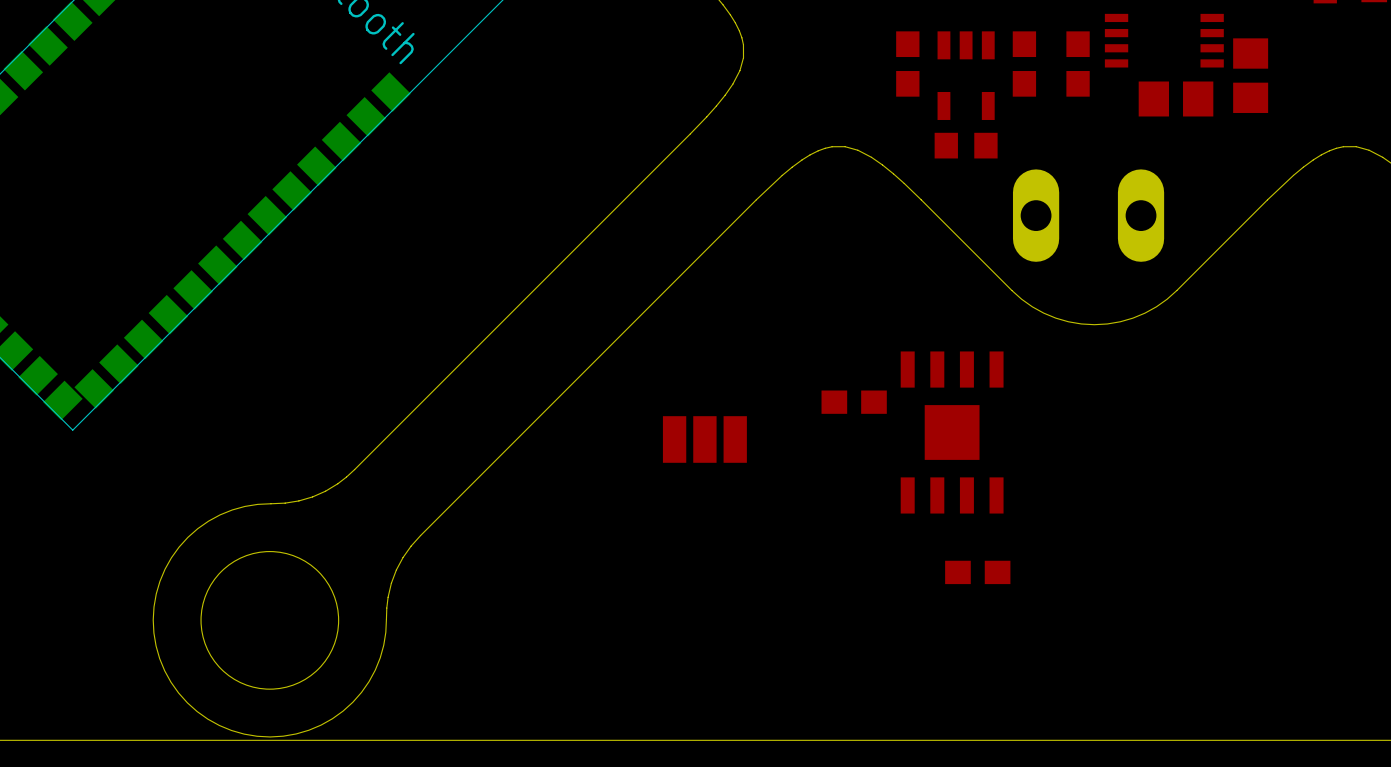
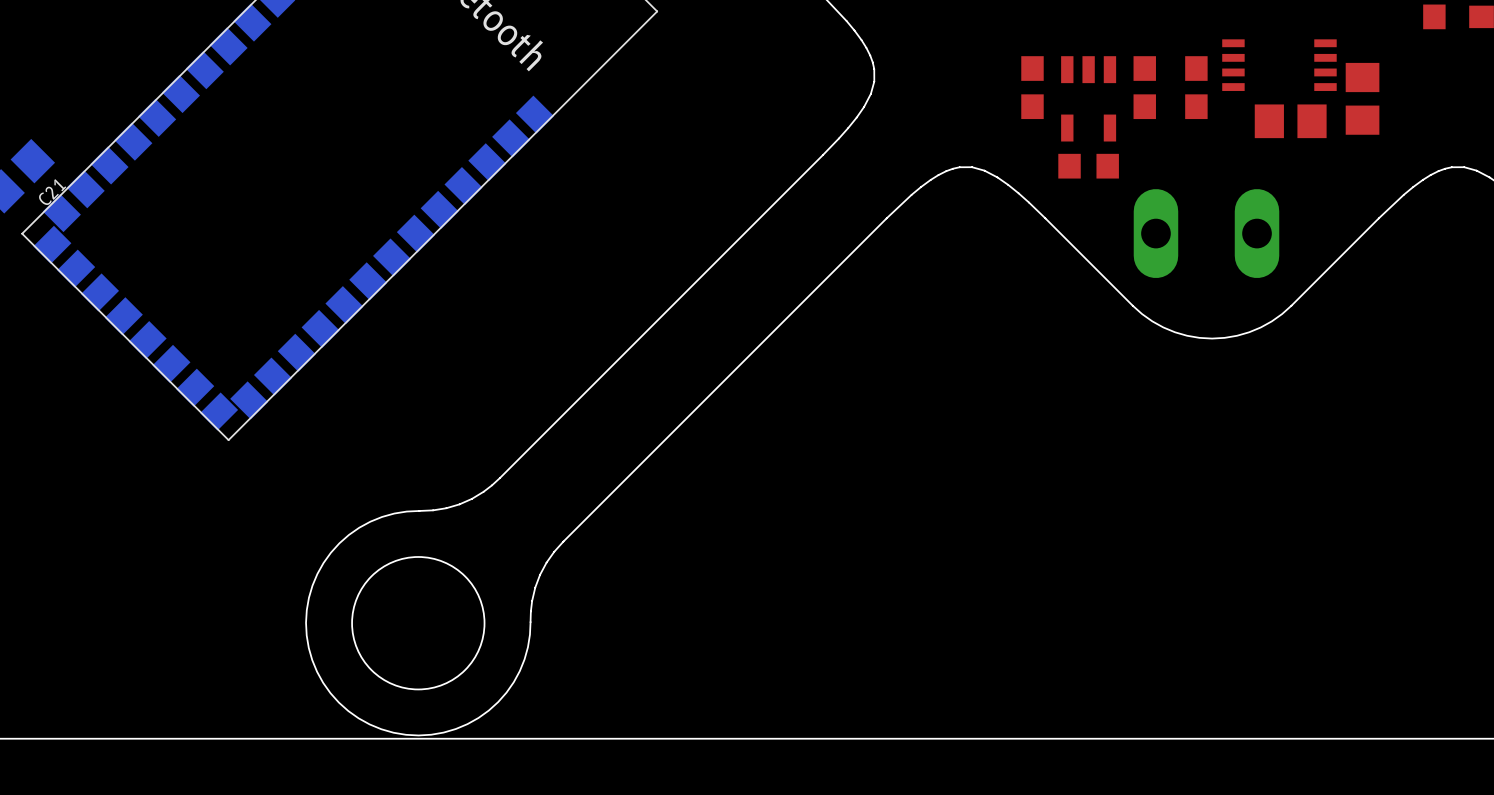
part: (854, 402) -> none
part: (952, 432) -> none
part: (674, 439) -> none
part: (704, 439) -> none
part: (735, 439) -> none
part: (977, 572) -> none

